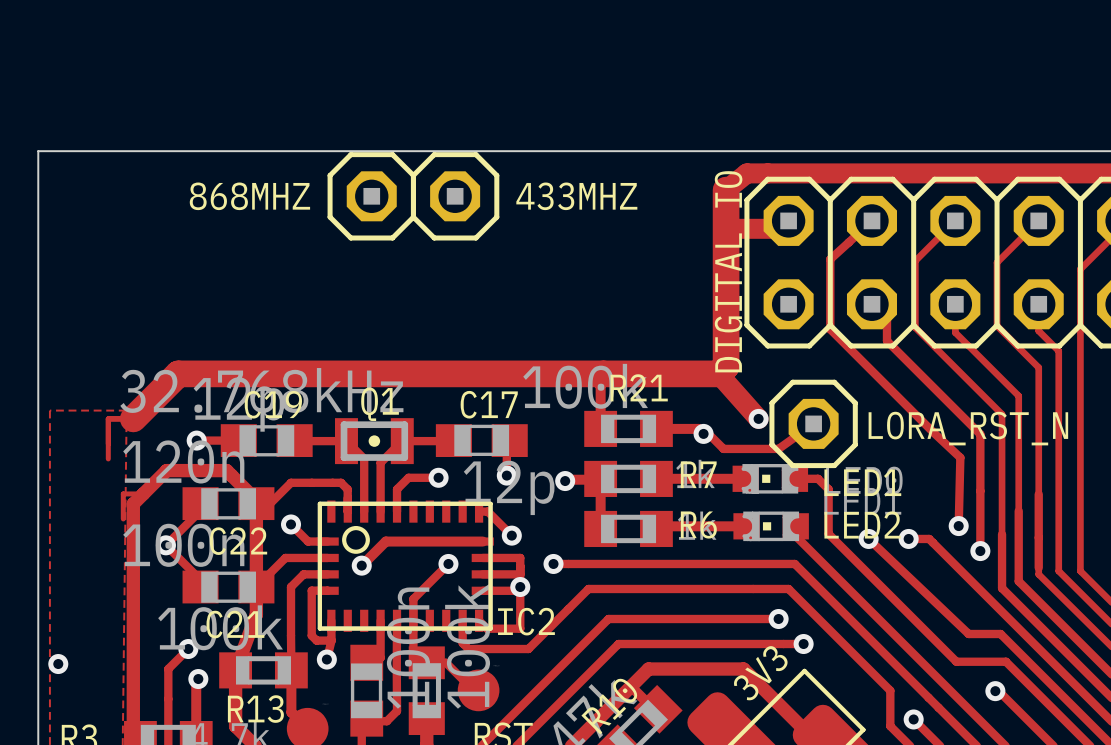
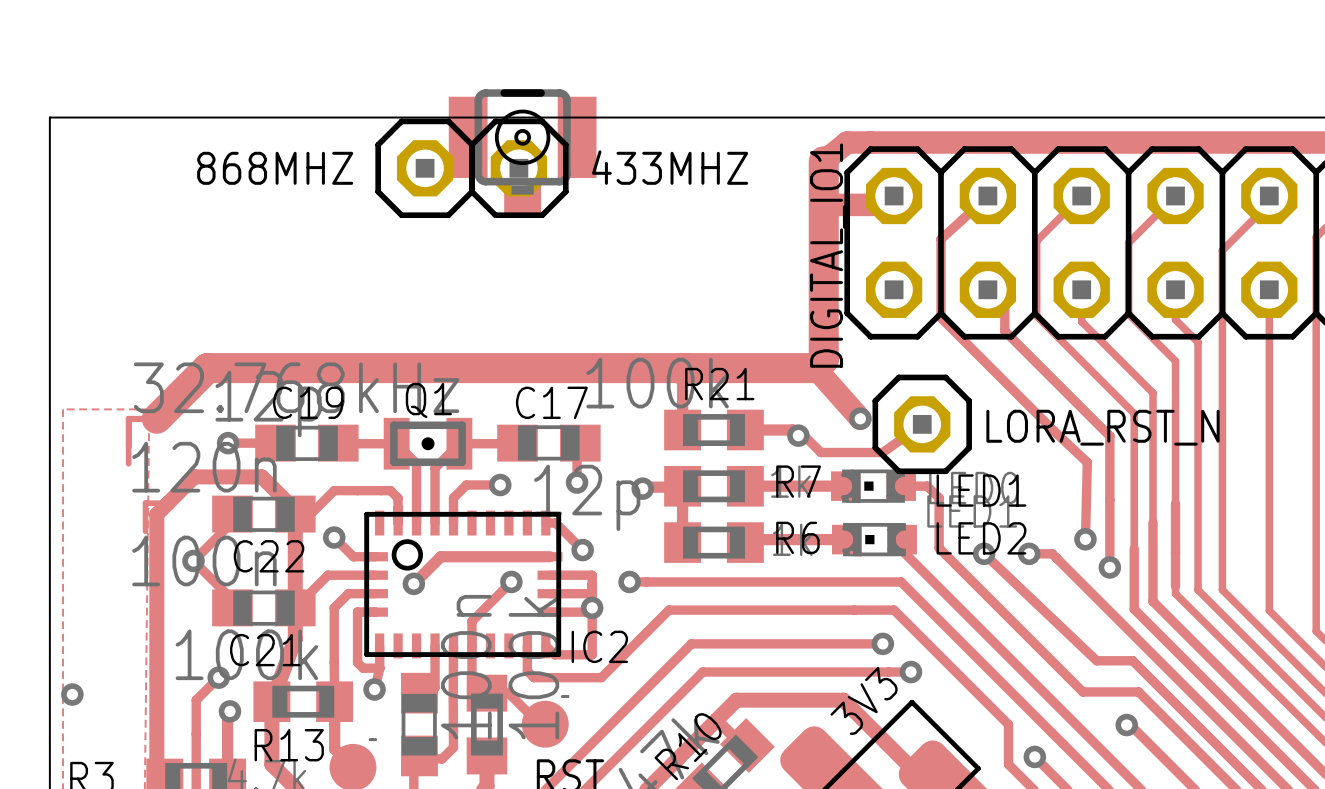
part: none -> (522, 151)
DIGITAL_IO name: DIGITAL_IO (731, 271) -> DIGITAL_IO1 (827, 255)

